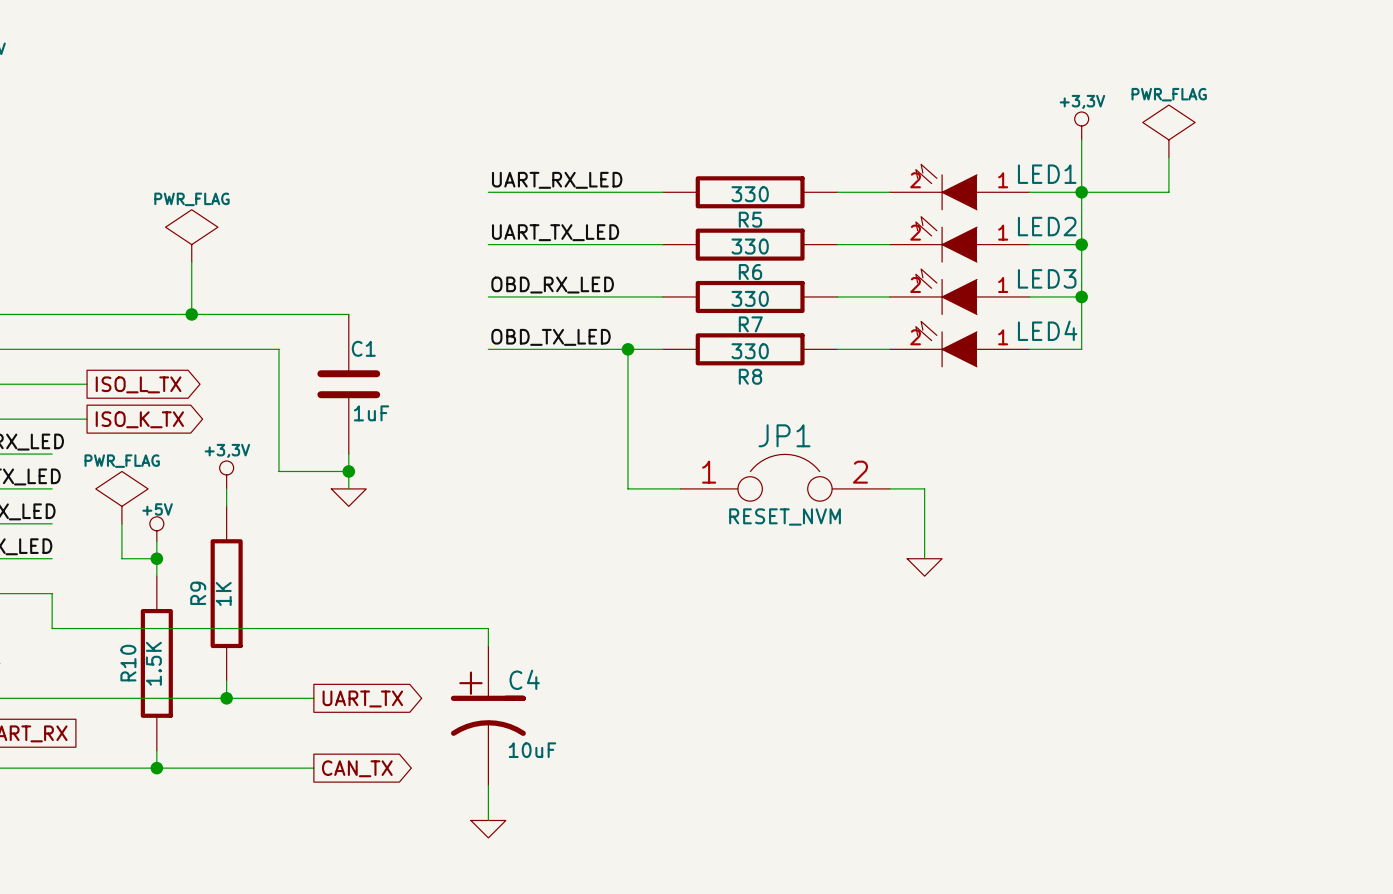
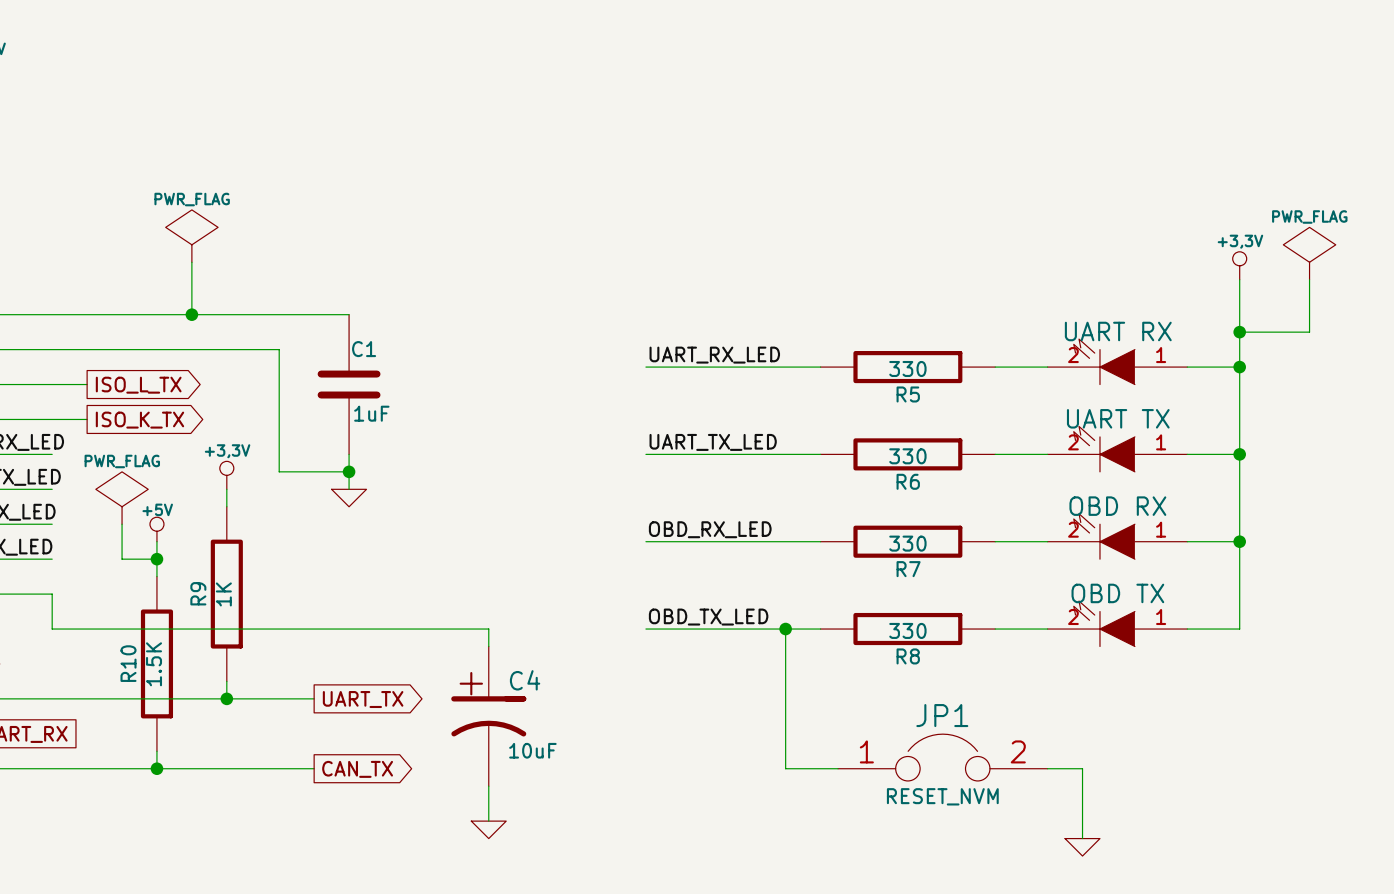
power symbol position: +3,3V (1081, 125) -> +3,3V (1239, 265)
power symbol position: PWR_FLAG (1168, 131) -> PWR_FLAG (1309, 253)
wire: (1081, 139) (1081, 349) (1029, 349) -> none
wire: (1168, 157) (1168, 192) (1029, 192) -> none
label position: UART_RX_LED (557, 180) -> UART_RX_LED (714, 355)
LED1: (959, 187) -> none
wire: (488, 192) (662, 192) -> none
R5 position: (750, 192) -> (907, 367)
wire: (837, 192) (889, 192) -> none
junction: (1081, 192) -> none
label position: UART_TX_LED (555, 232) -> UART_TX_LED (713, 442)
LED2: (959, 239) -> none
wire: (488, 244) (662, 244) -> (645, 454) (820, 454)
R6 position: (750, 244) -> (907, 454)
wire: (837, 244) (889, 244) -> (995, 454) (1047, 454)
wire: (1029, 244) (1081, 244) -> (1187, 454) (1239, 454)
junction: (1081, 244) -> none
wire: none -> (1239, 279) (1239, 629) (1187, 629)
wire: none -> (1309, 279) (1309, 332) (1239, 332)
label position: OBD_RX_LED (552, 285) -> OBD_RX_LED (710, 529)
LED3: (959, 291) -> none
wire: (488, 296) (662, 296) -> (645, 367) (820, 367)
R7 position: (750, 296) -> (907, 541)
wire: (837, 296) (889, 296) -> (995, 367) (1047, 367)
wire: (1029, 296) (1081, 296) -> (1187, 367) (1239, 367)
junction: (1081, 296) -> none
junction: none -> (1239, 332)
label position: OBD_TX_LED (551, 337) -> OBD_TX_LED (708, 617)
LED4: (959, 344) -> none
wire: (488, 349) (662, 349) -> (645, 629) (820, 629)
wire: (627, 349) (627, 488) (680, 488) -> (785, 629) (785, 768) (838, 768)
junction: (627, 349) -> none
R8 position: (750, 349) -> (907, 629)
wire: (837, 349) (889, 349) -> (995, 629) (1047, 629)
part: none -> UART RX (1117, 361)
junction: none -> (1239, 367)
part: none -> UART TX (1117, 449)
junction: none -> (1239, 454)
JP1 position: (785, 477) -> (942, 757)
wire: (889, 488) (924, 488) (924, 558) -> (1047, 768) (1082, 768) (1082, 838)
part: none -> OBD RX (1117, 536)
wire: none -> (645, 541) (820, 541)
wire: none -> (995, 541) (1047, 541)
wire: none -> (1187, 541) (1239, 541)
junction: none -> (1239, 541)
power symbol position: (924, 567) -> (1082, 847)
part: none -> OBD TX (1117, 623)
junction: none -> (785, 629)

